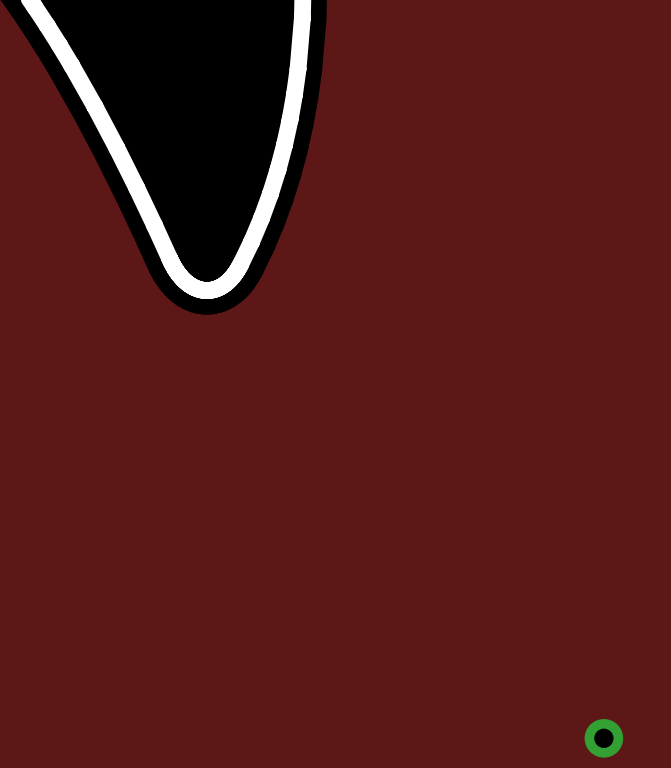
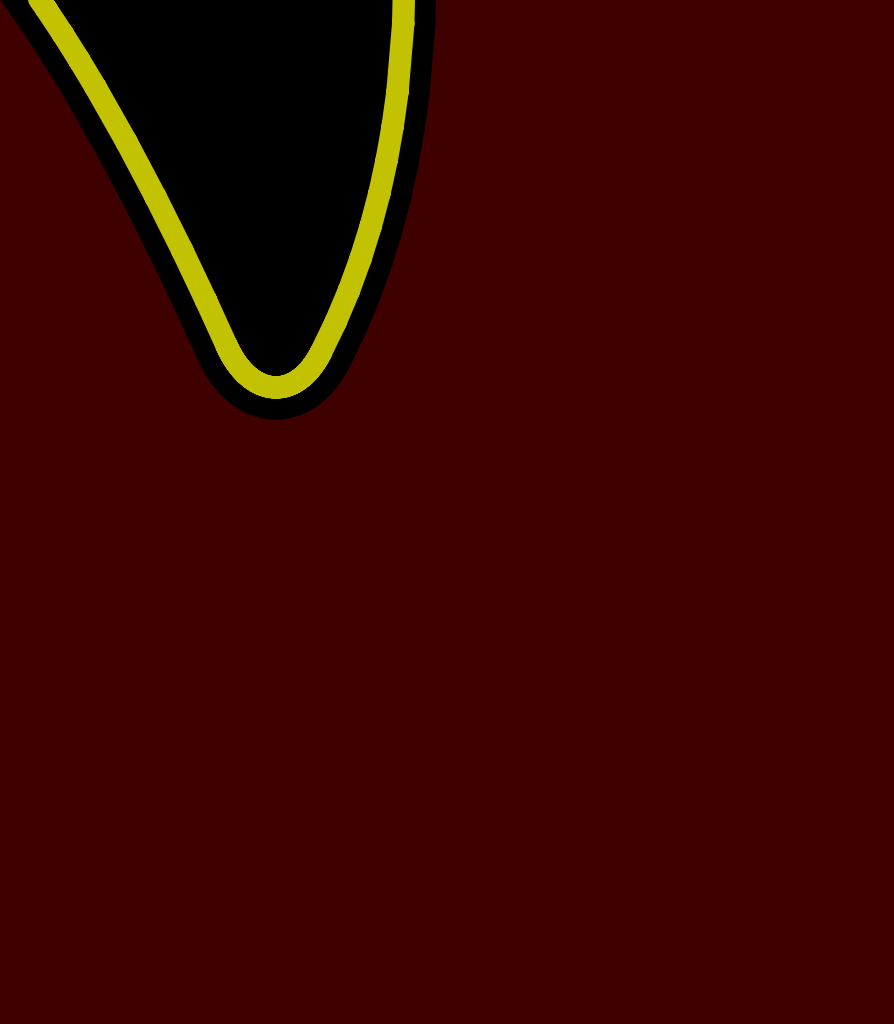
via: (603, 738) -> none

